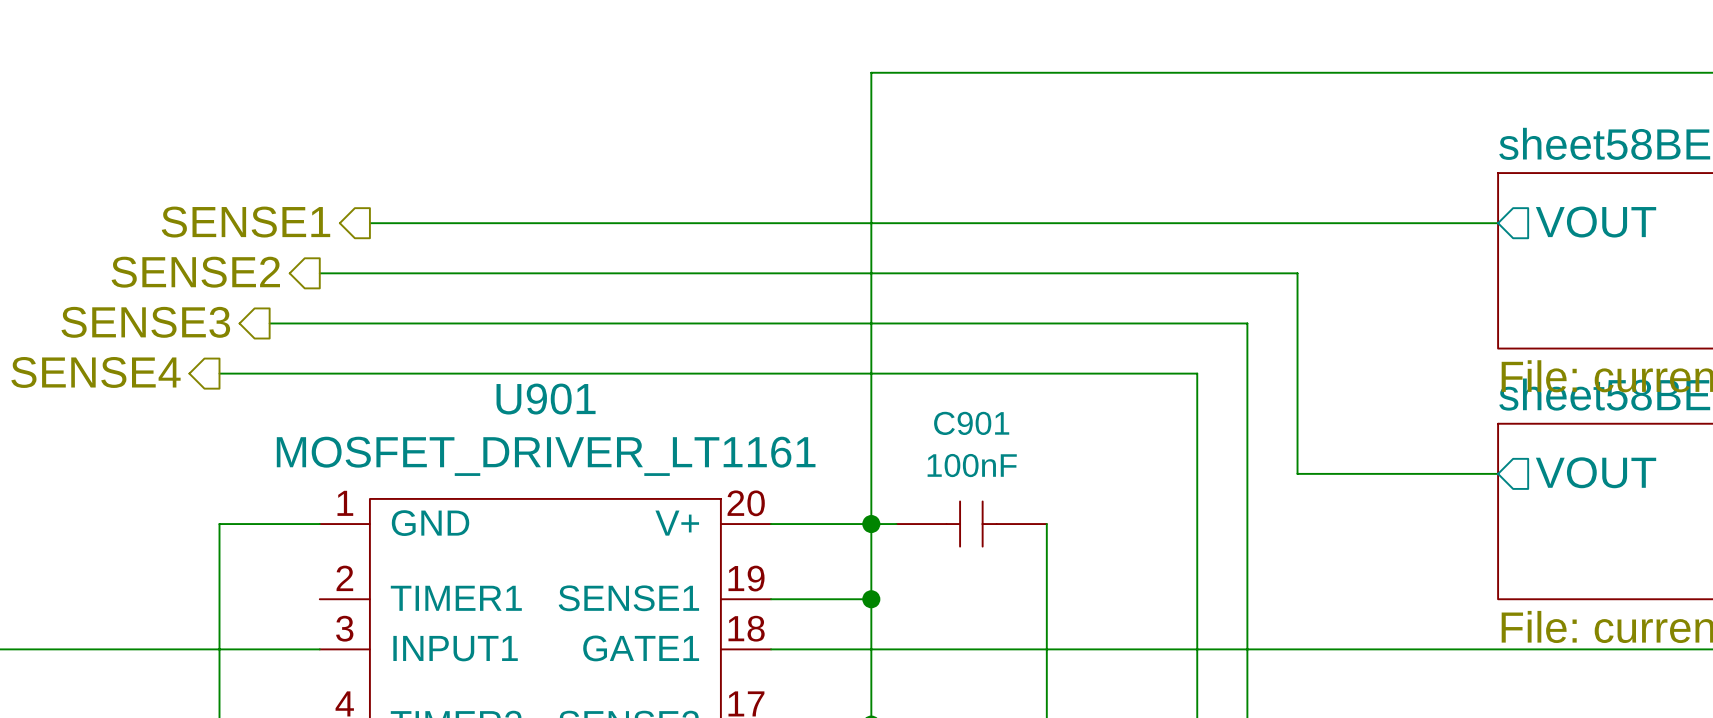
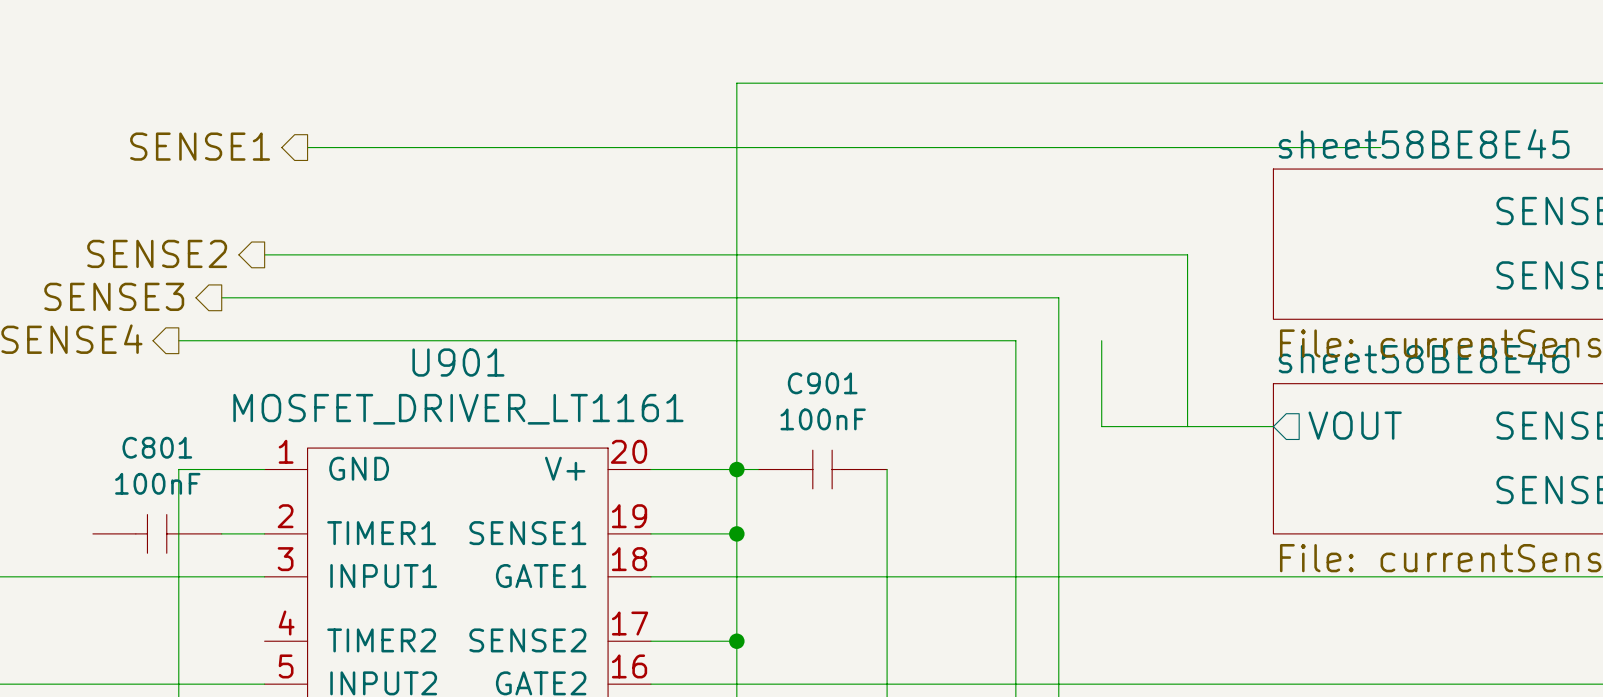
wire: none -> (307, 147) (1380, 147)
hierarchical label position: SENSE1 (245, 222) -> SENSE1 (200, 146)
sheet pin: VOUT (1596, 222) -> none
wire: (369, 223) (1498, 223) -> none
wire: (1297, 273) (1297, 373) -> (1101, 254) (1187, 254) (1187, 426)
C801: none -> 100nF (157, 533)
wire: none -> (221, 533) (264, 533)

